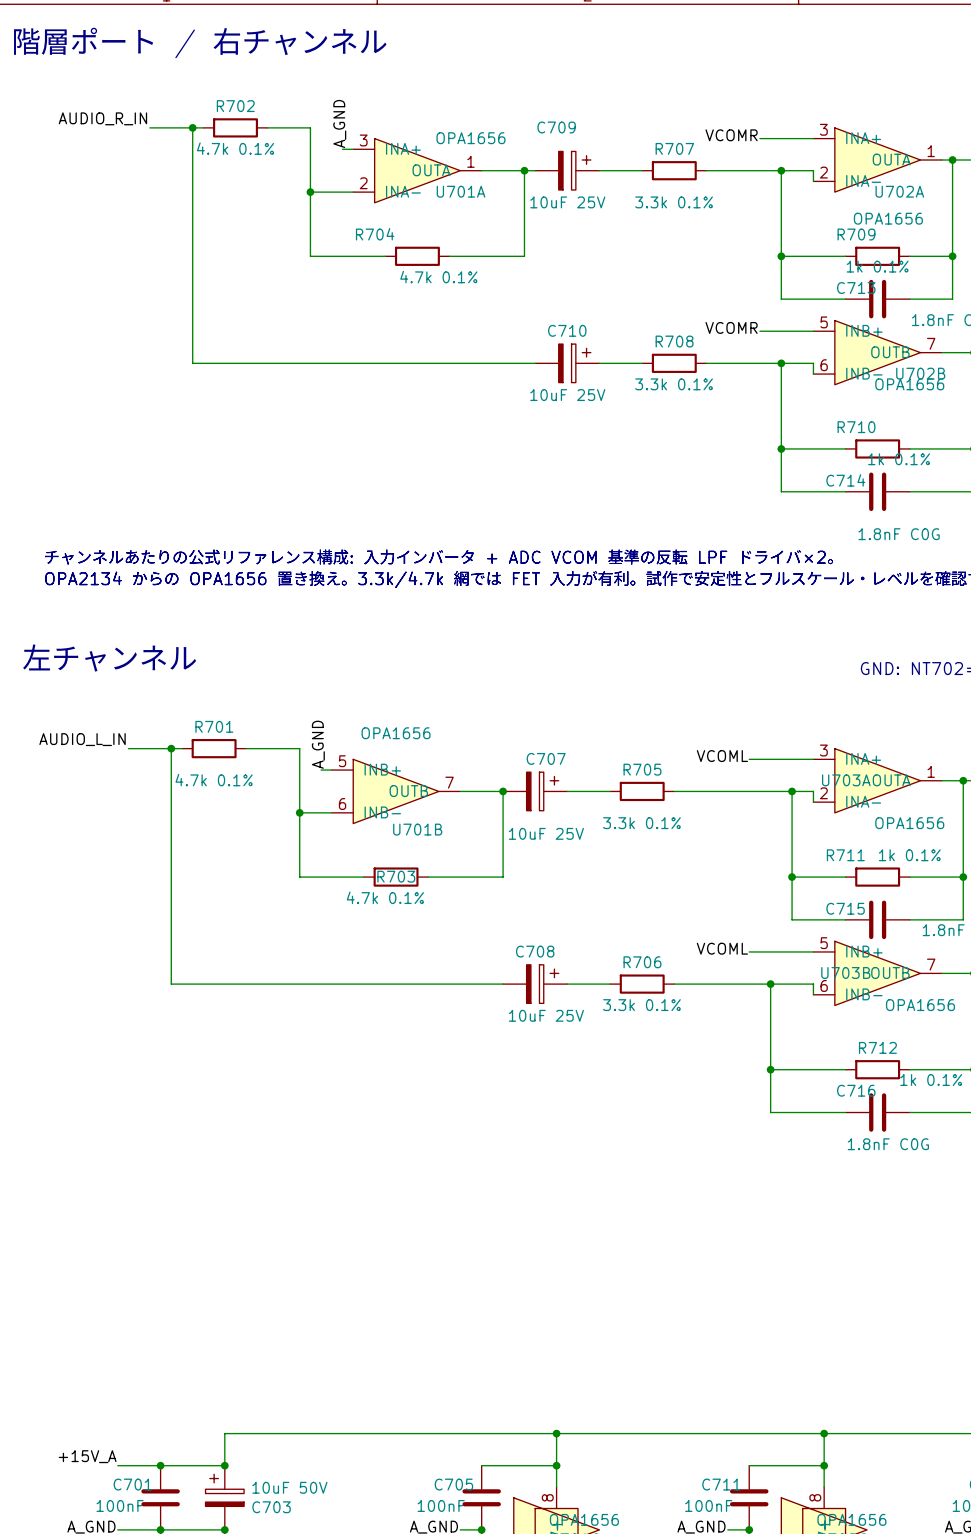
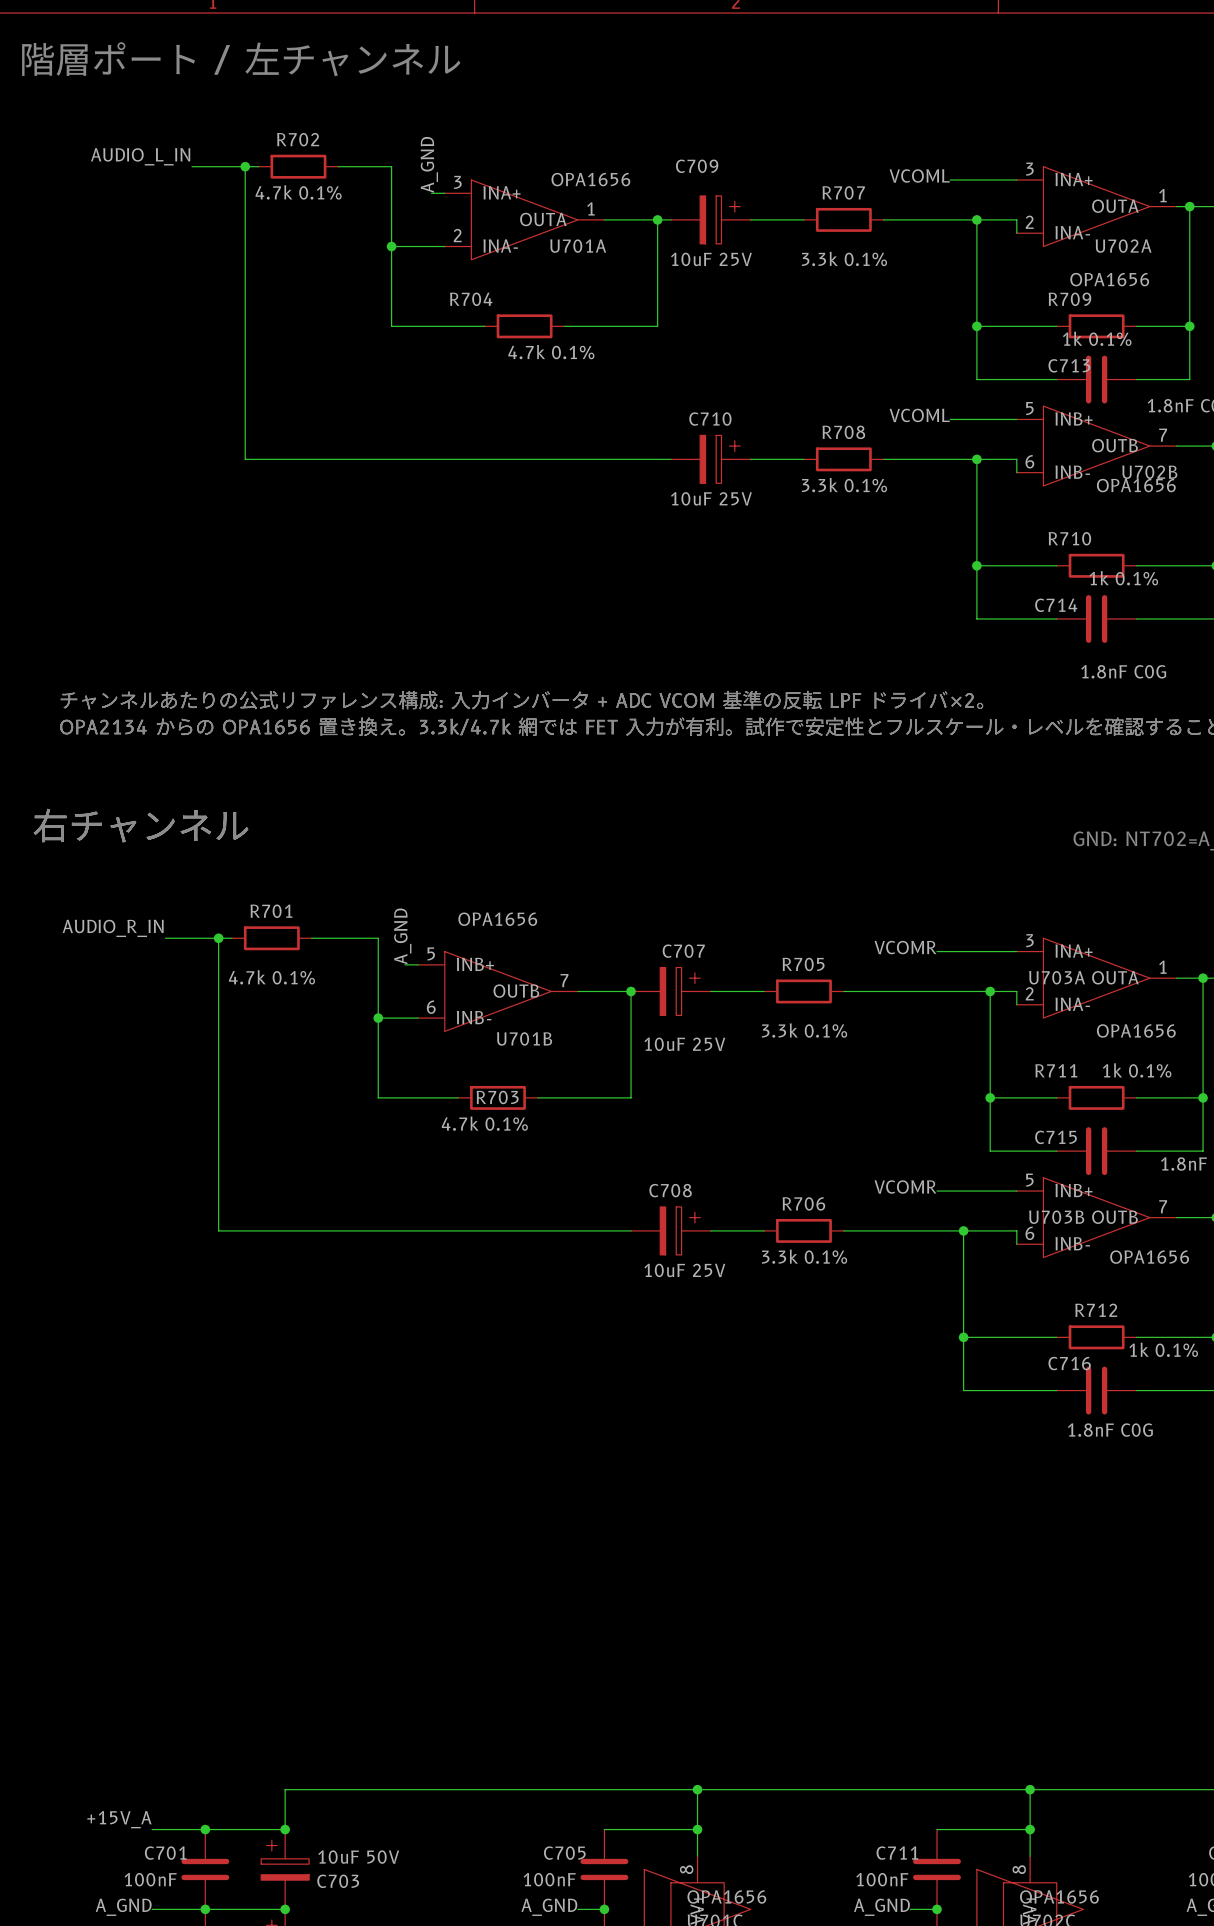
text: 階層ポート / 右チャンネル (200, 42) -> 階層ポート / 左チャンネル (241, 59)
label: AUDIO_R_IN (102, 118) -> AUDIO_L_IN (140, 156)
label: VCOMR (731, 135) -> VCOML (919, 176)
label: VCOMR (731, 327) -> VCOML (919, 415)
text: 左チャンネル (109, 658) -> 右チャンネル (140, 825)
label: AUDIO_L_IN (82, 739) -> AUDIO_R_IN (113, 928)
label: VCOML (722, 756) -> VCOMR (905, 947)
label: VCOML (722, 948) -> VCOMR (905, 1187)

